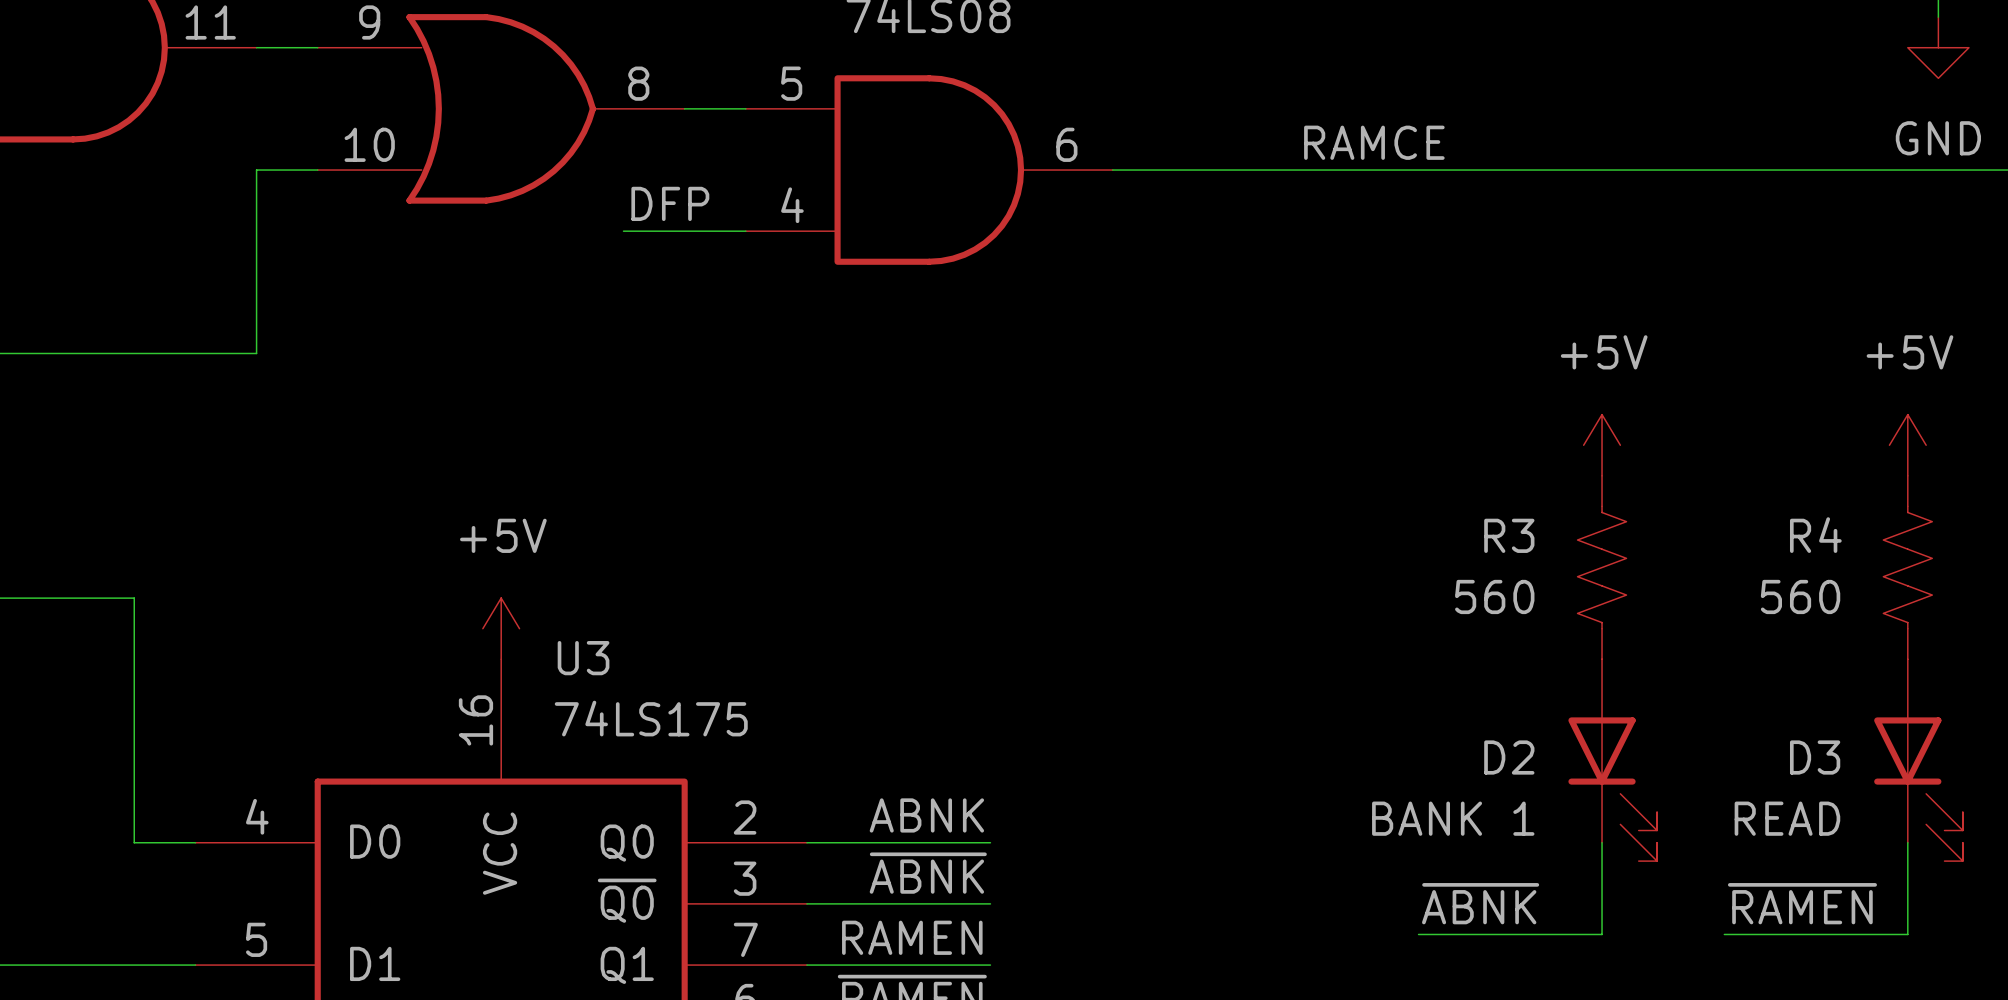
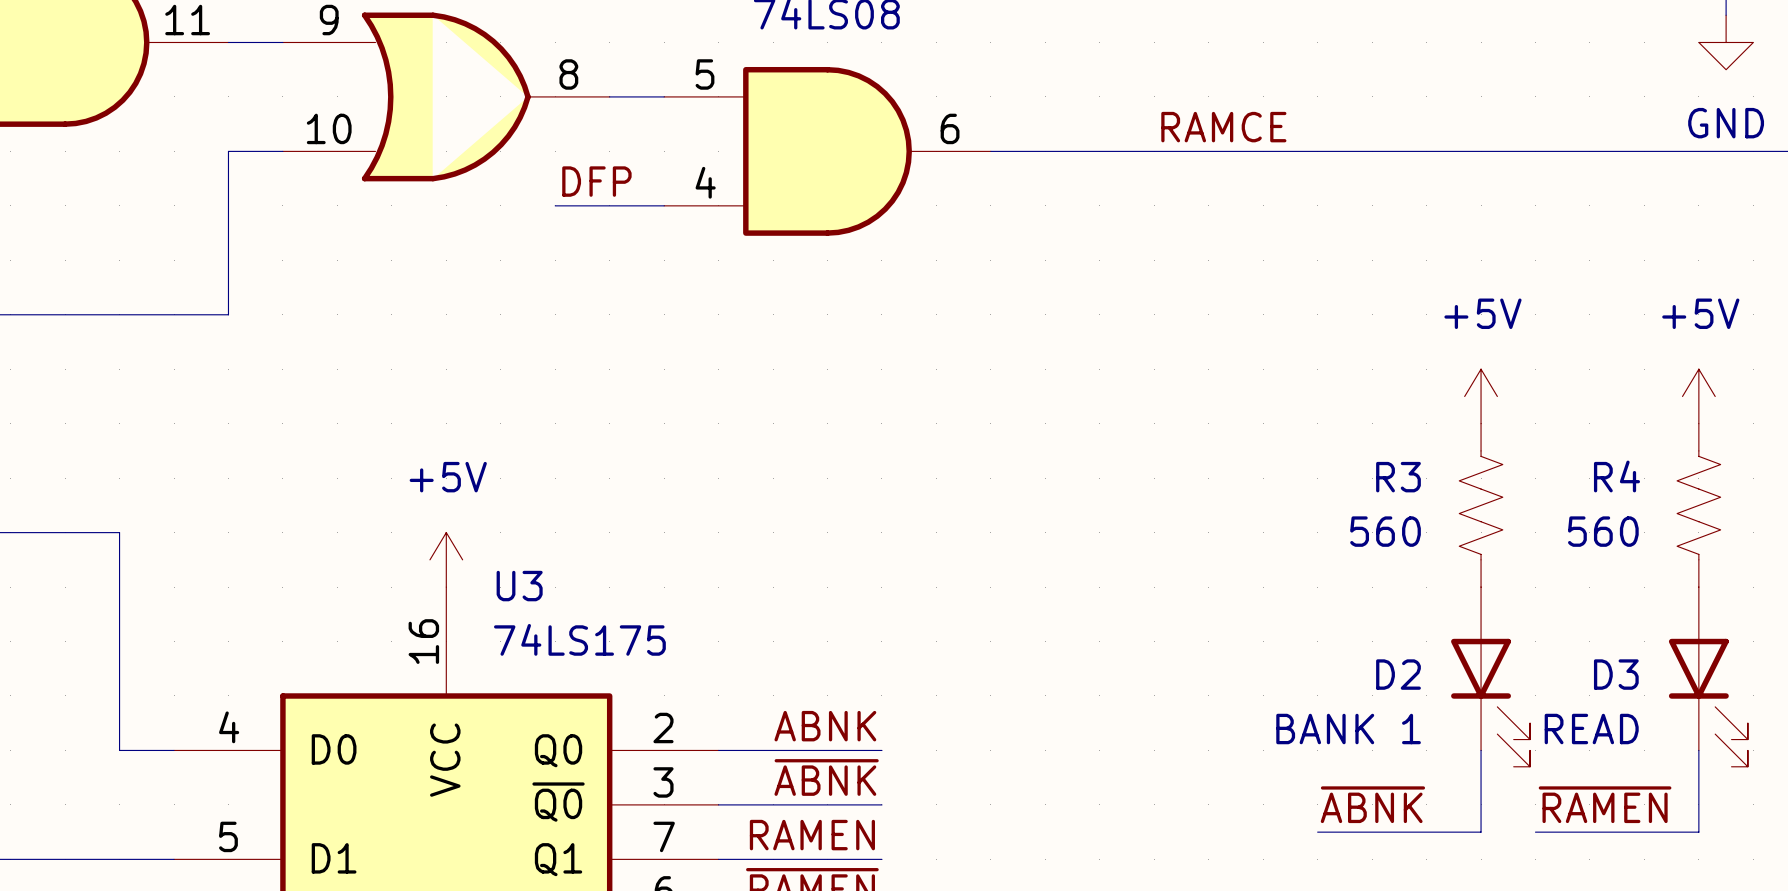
power symbol position: +5V (1602, 445) -> +5V (1481, 396)
R3 position: (1602, 567) -> (1481, 505)
D2 position: (1612, 760) -> (1490, 676)
wire: (1602, 842) (1602, 934) -> (1481, 750) (1481, 832) (1426, 832)
label position: ~{ABNK} (1480, 903) -> ~{ABNK} (1372, 804)
wire: (1418, 934) (1479, 934) -> none

